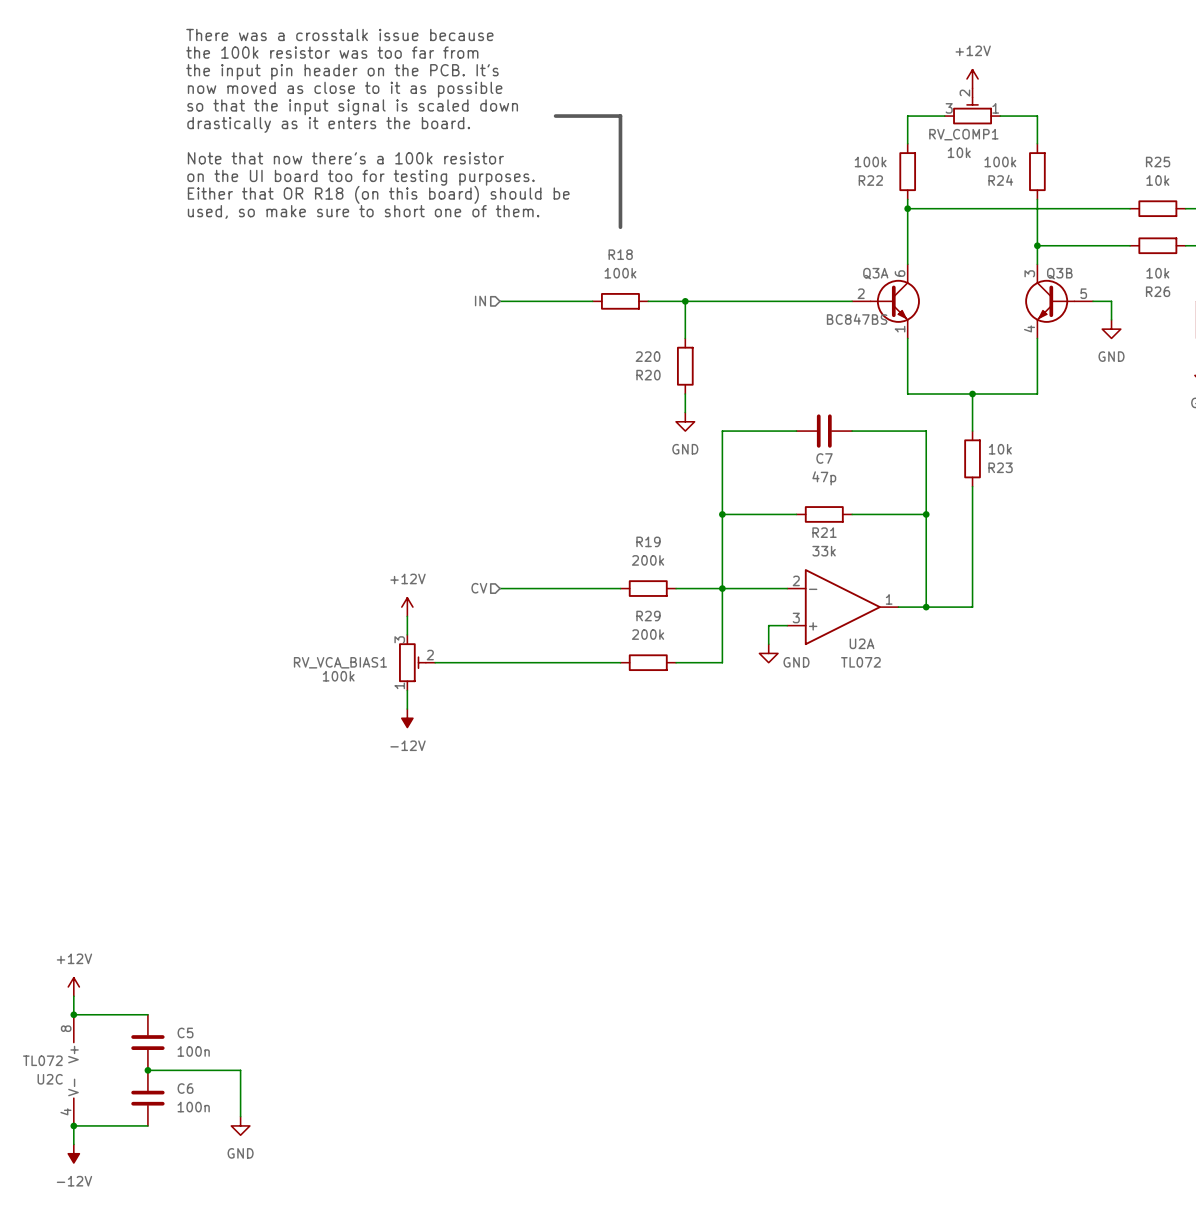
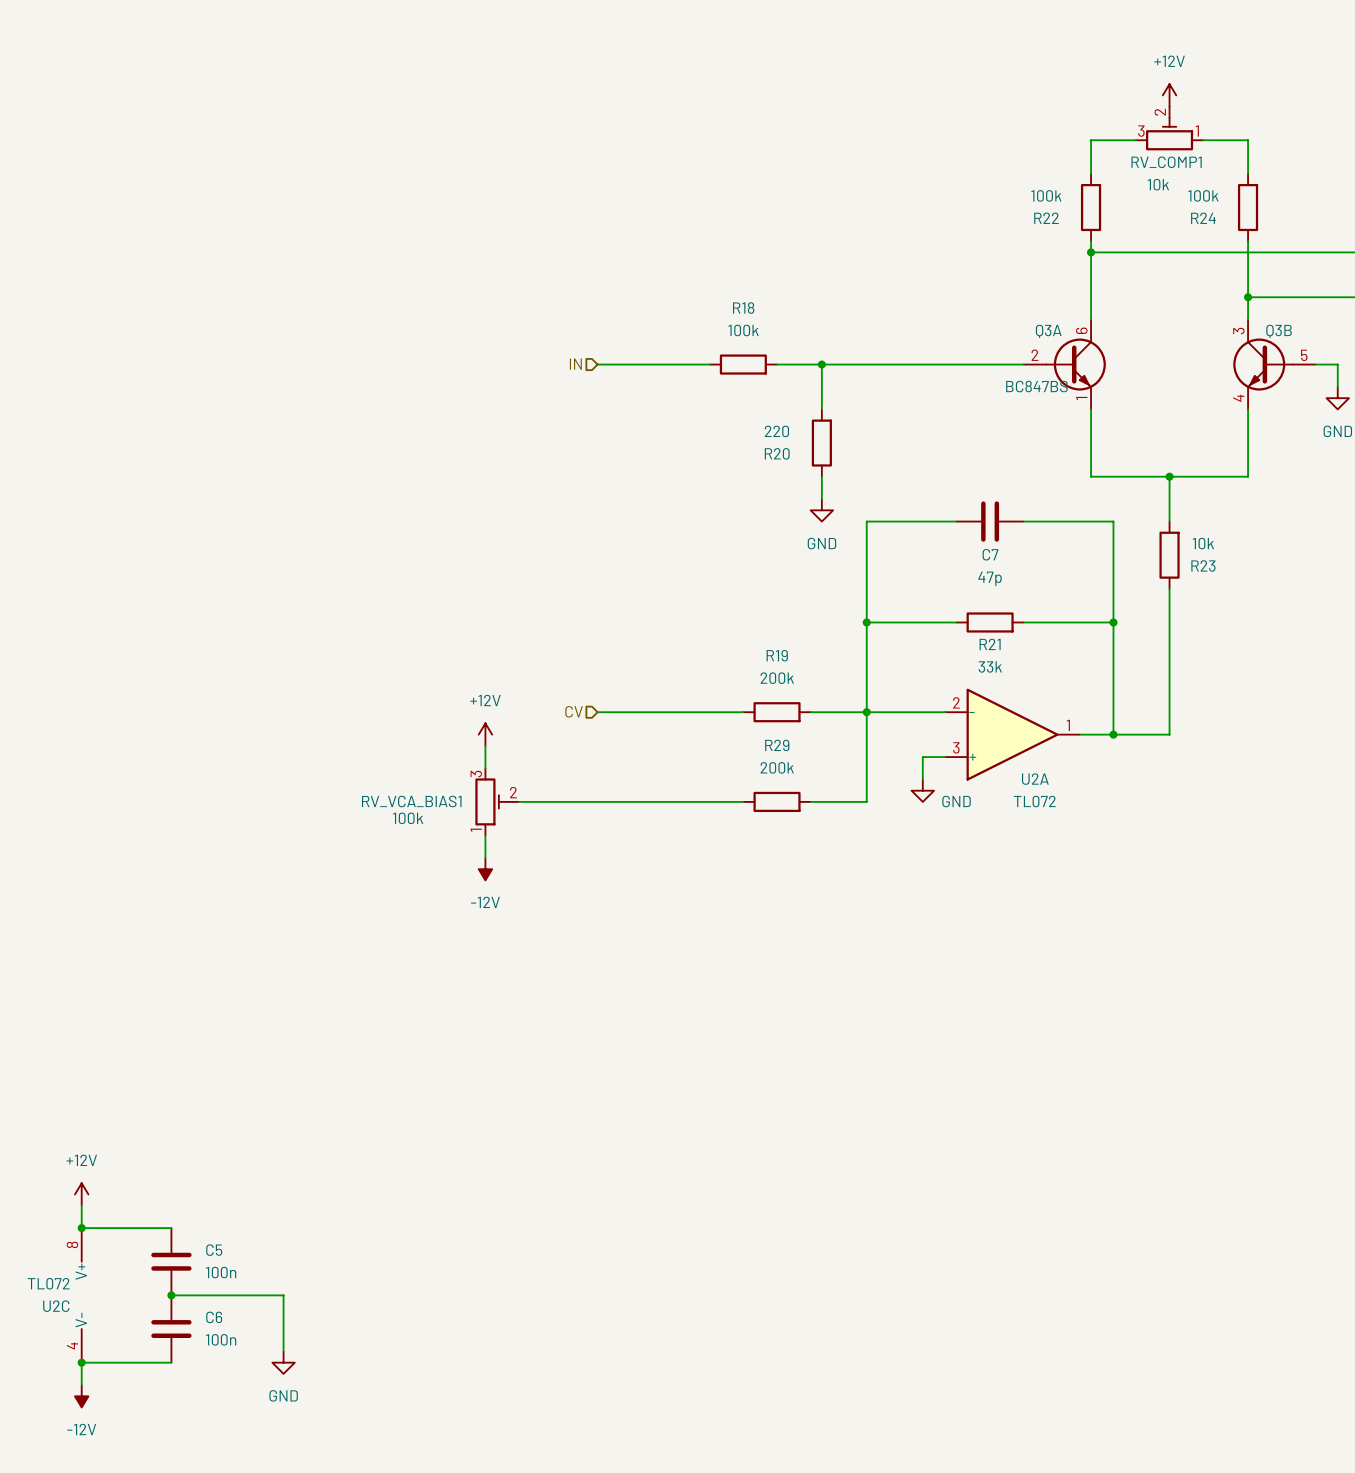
text: There was a crosstalk issue because (339, 34) -> none
text: the 100k resistor was too far from (332, 52) -> none
text: the input pin header on the PCB. It's (342, 72) -> none
text: now moved as close to it as possible (345, 89) -> none
text: so that the input signal is scaled down (352, 107) -> none
line: (555, 116) (620, 116) (620, 227) -> none
text: drastically as it enters the board. (328, 124) -> none
text: Note that now there's a 100k resistor (345, 158) -> none
text: on the UI board too for testing purposes. (360, 177) -> none
text: Either that OR R18 (on this board) should be (378, 194) -> none
text: used, so make sure to short one of them. (363, 211) -> none

